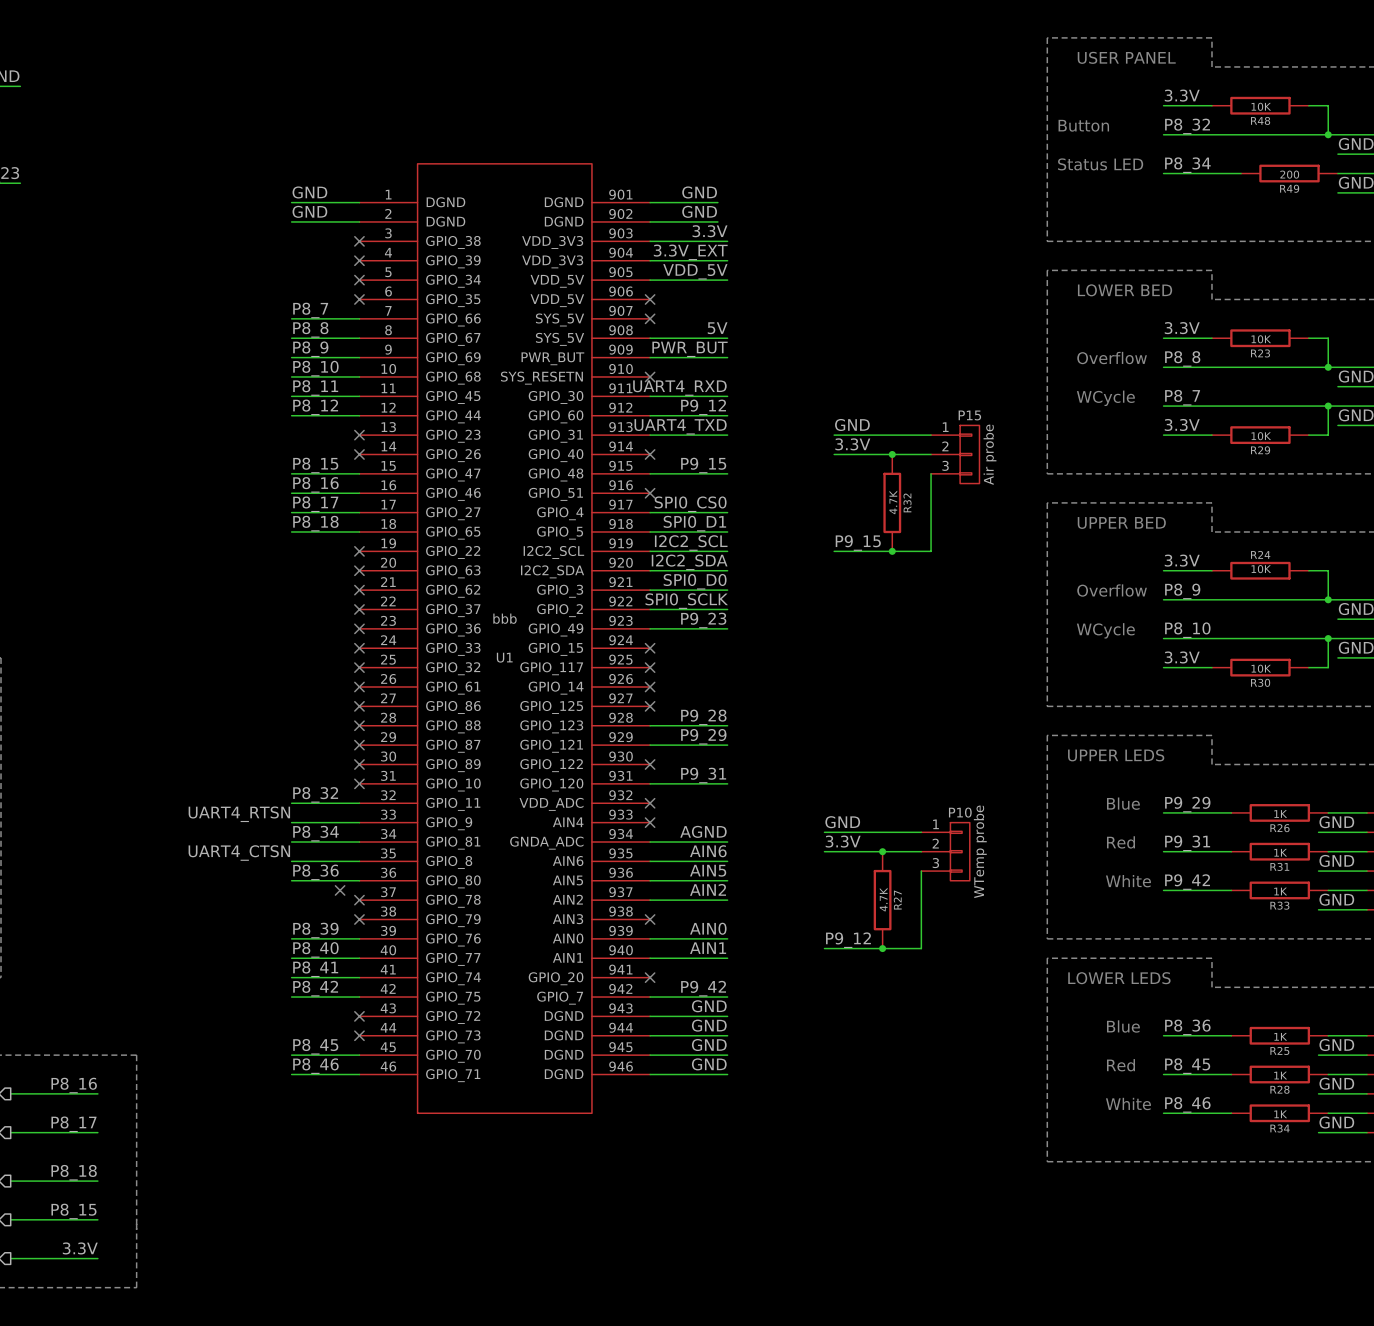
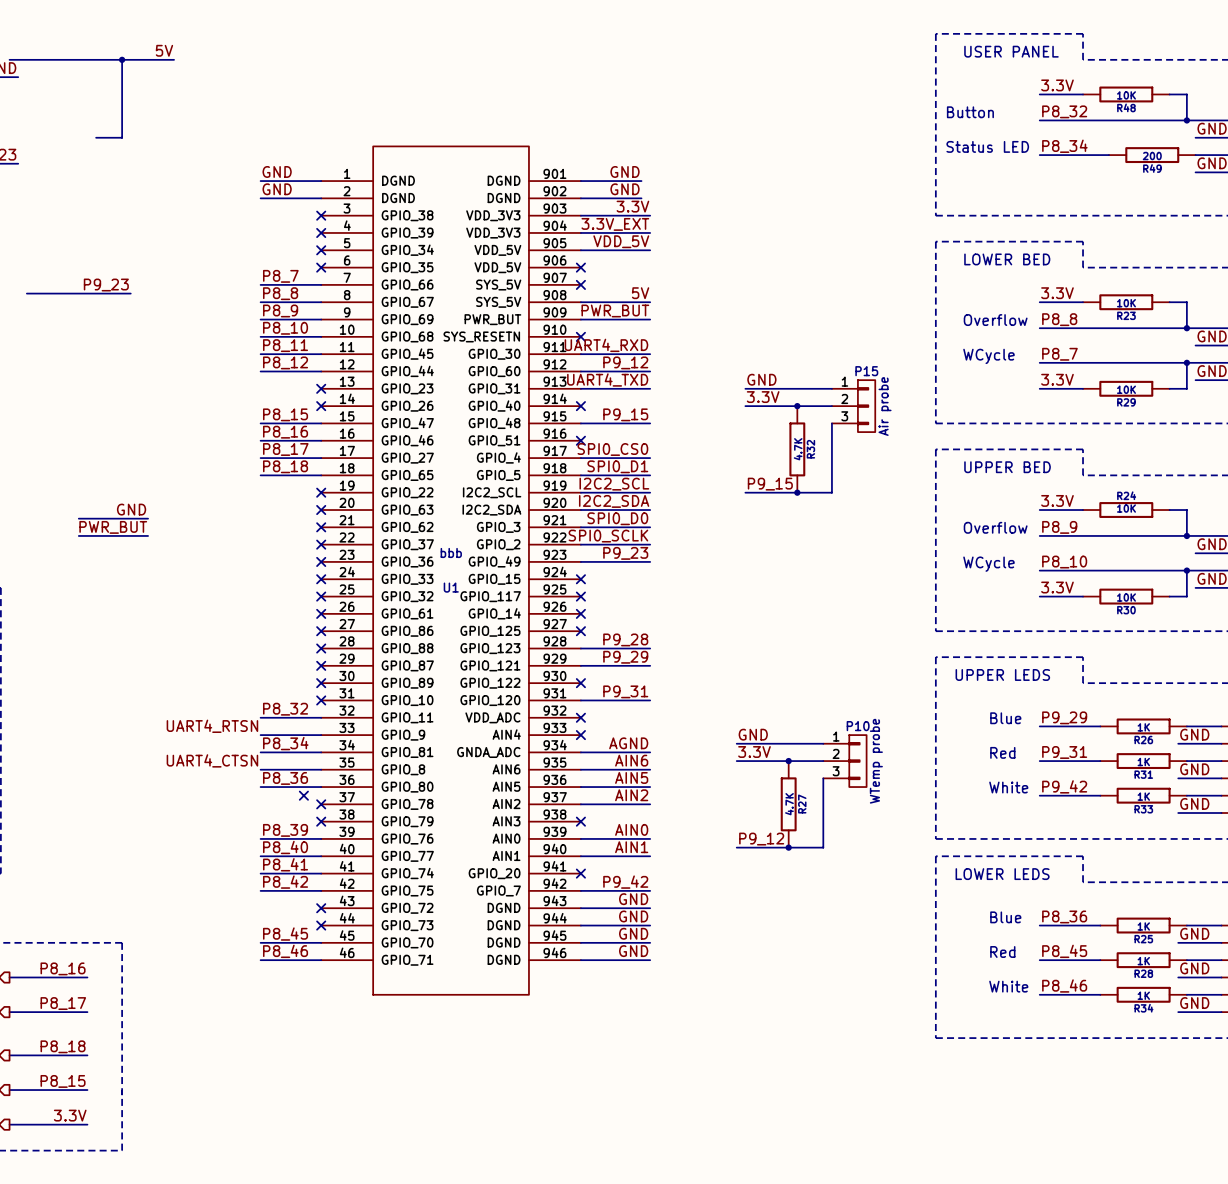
label: none -> 5V (164, 50)
wire: none -> (9, 59) (174, 59)
wire: none -> (122, 59) (122, 137) (96, 137)
junction: none -> (122, 59)
label: none -> P9_23 (106, 285)
wire: none -> (26, 293) (130, 293)
label: none -> GND (131, 509)
wire: none -> (78, 518) (148, 518)
label: none -> PWR_BUT (113, 527)
wire: none -> (78, 535) (148, 535)

